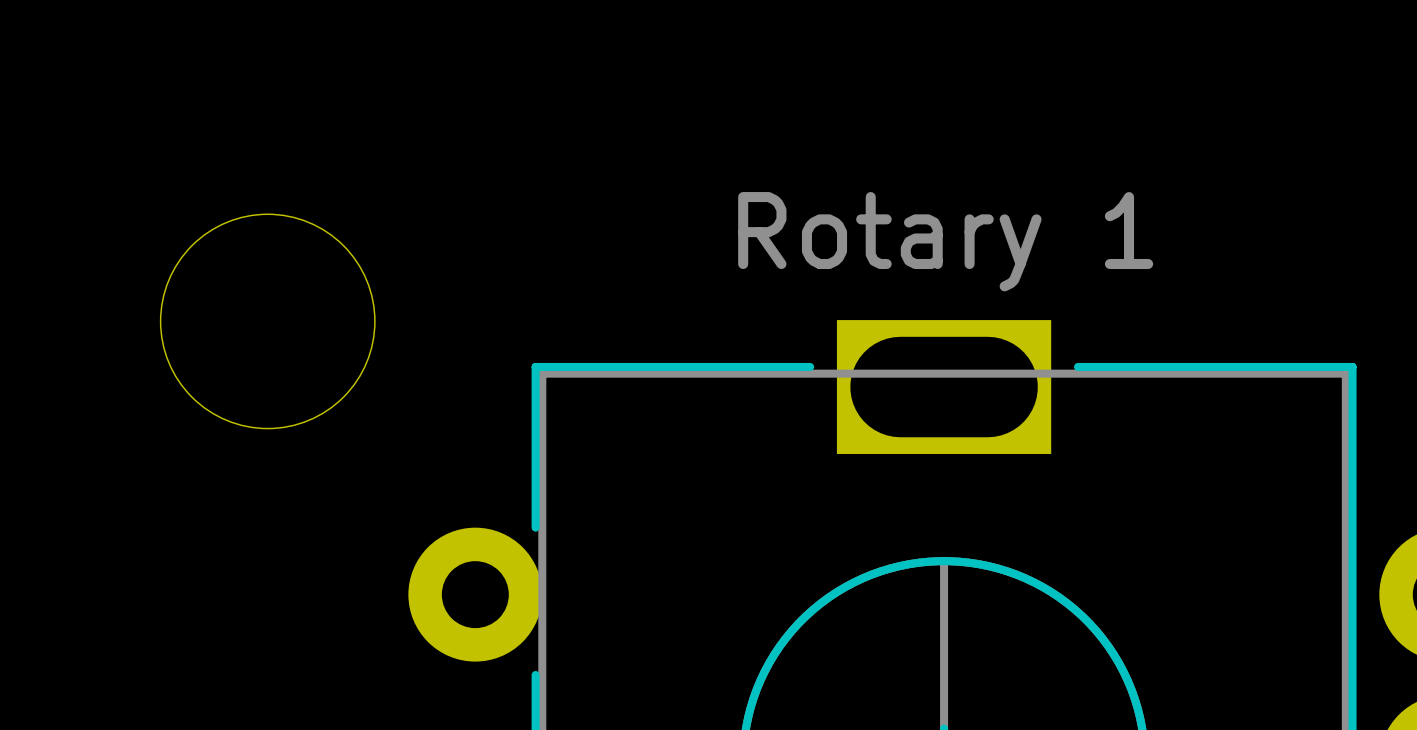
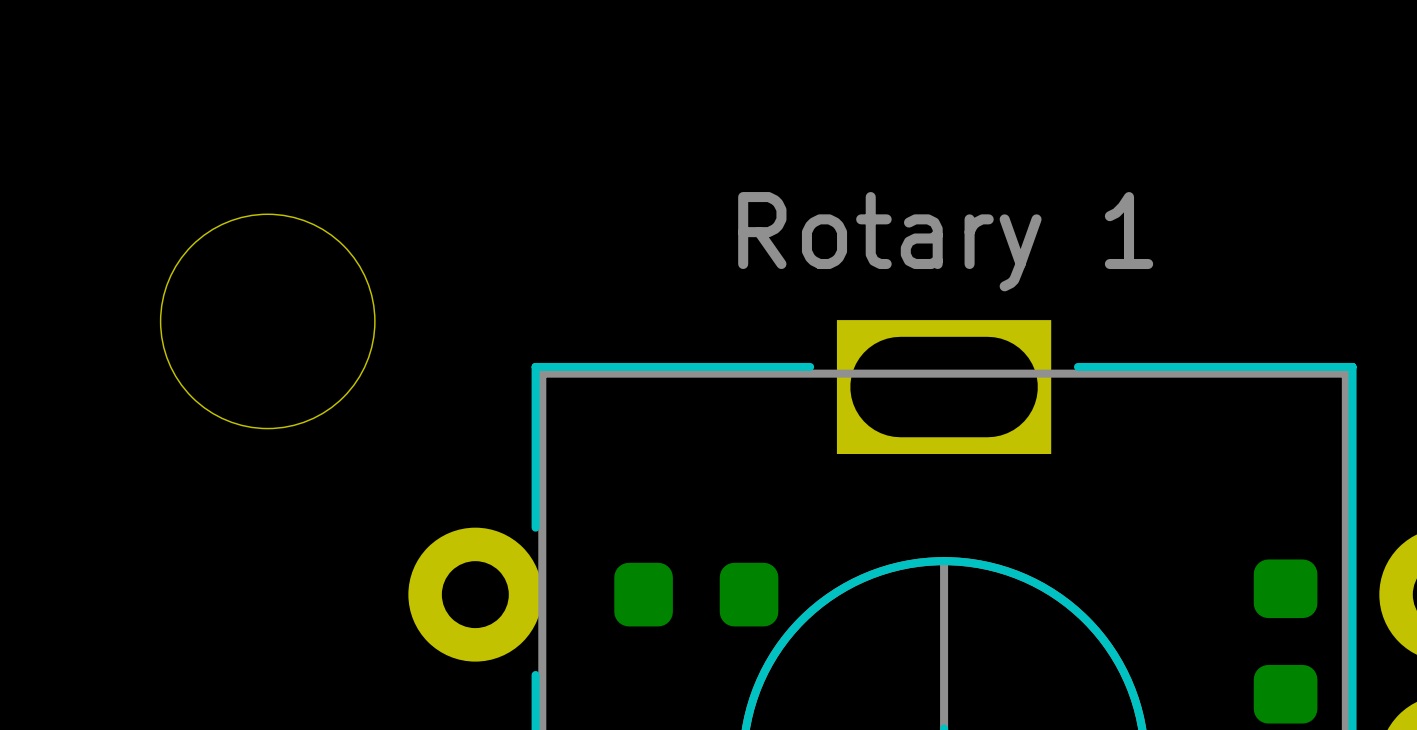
part: none -> (696, 594)
part: none -> (1285, 641)

